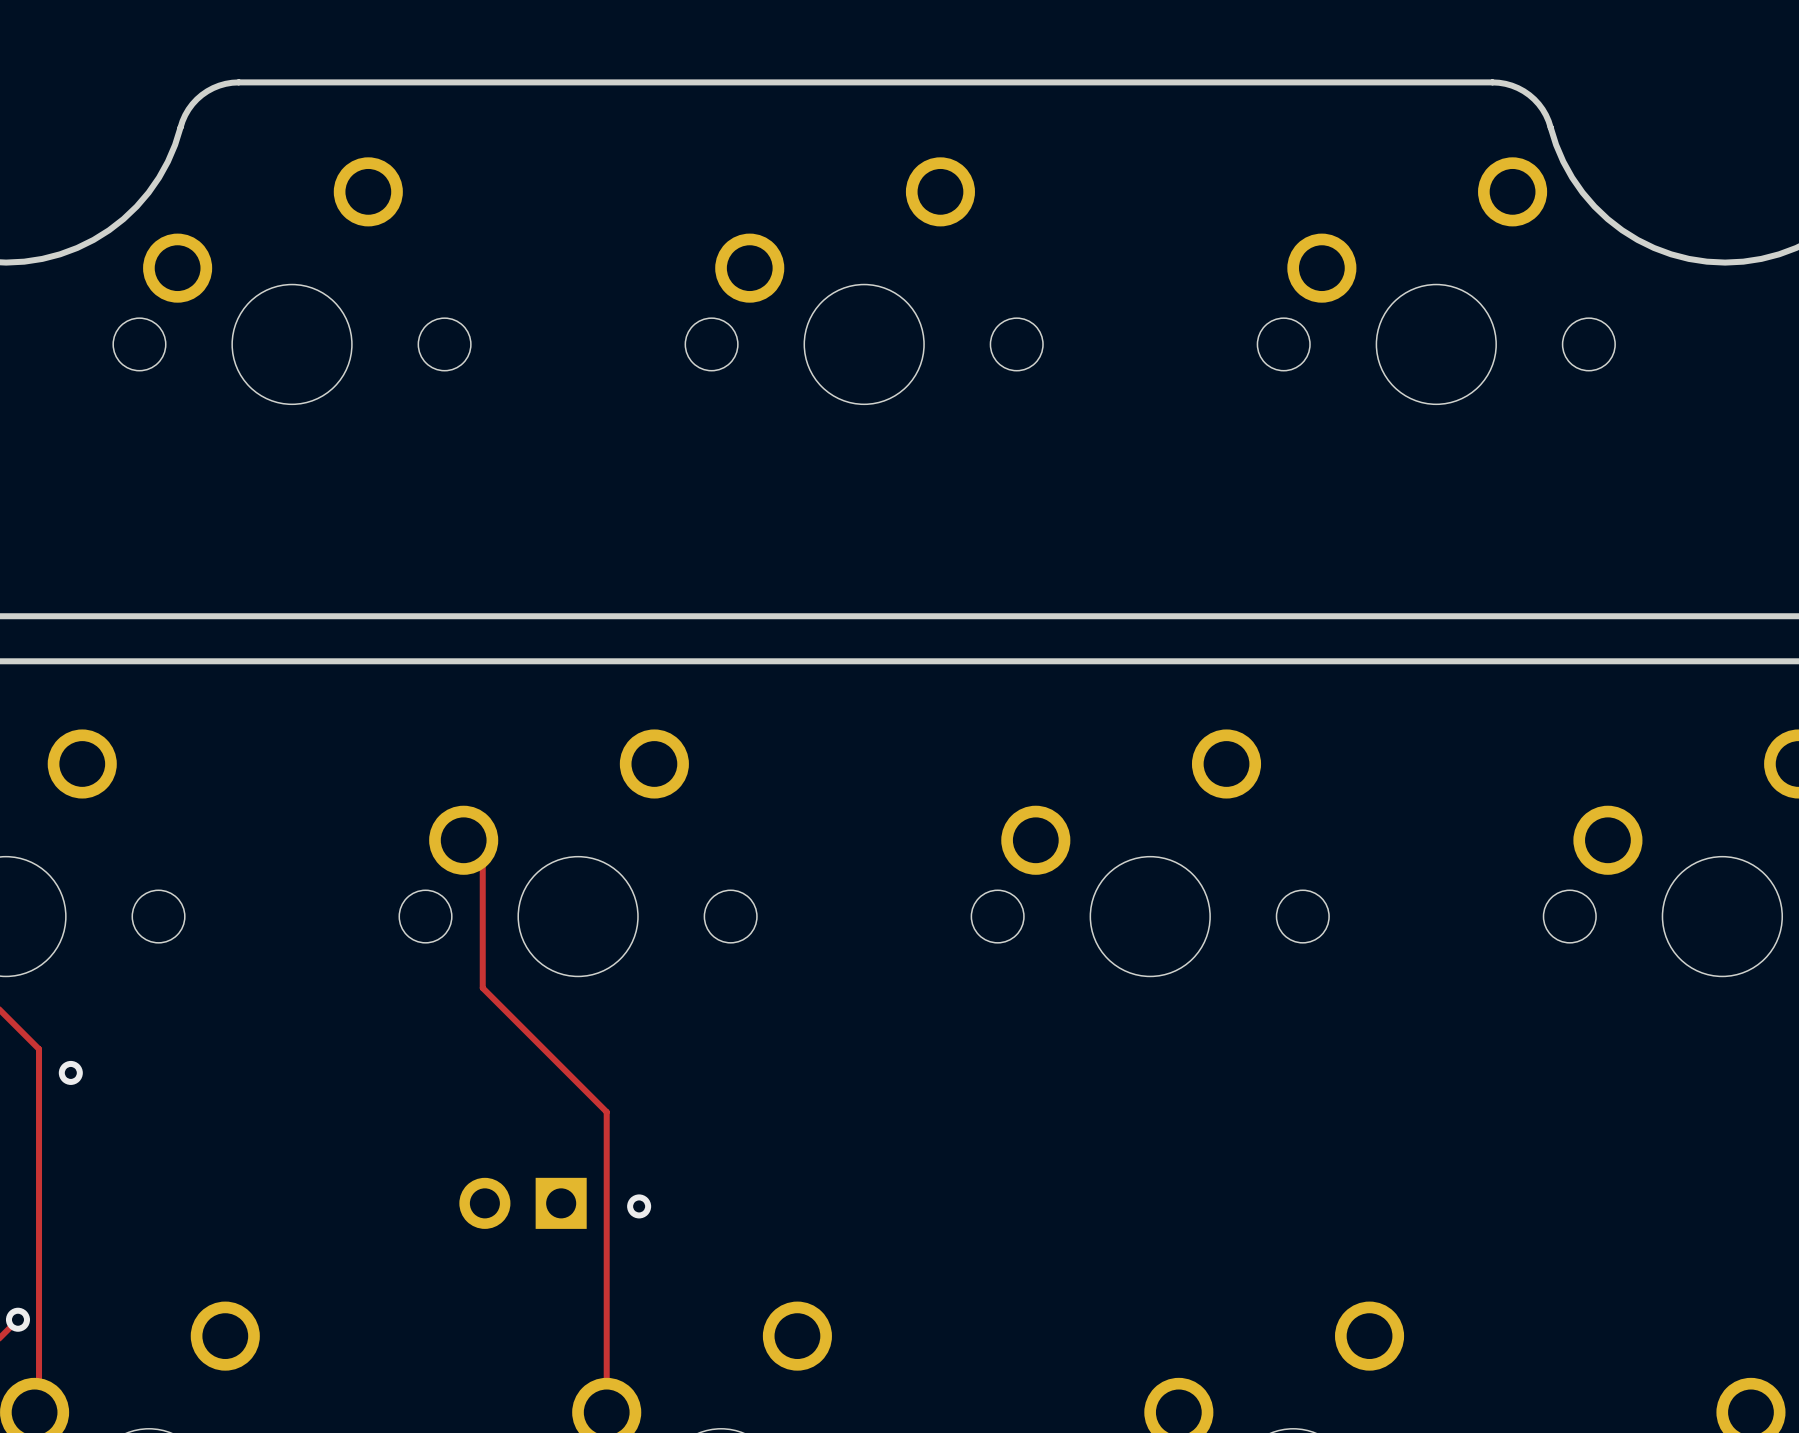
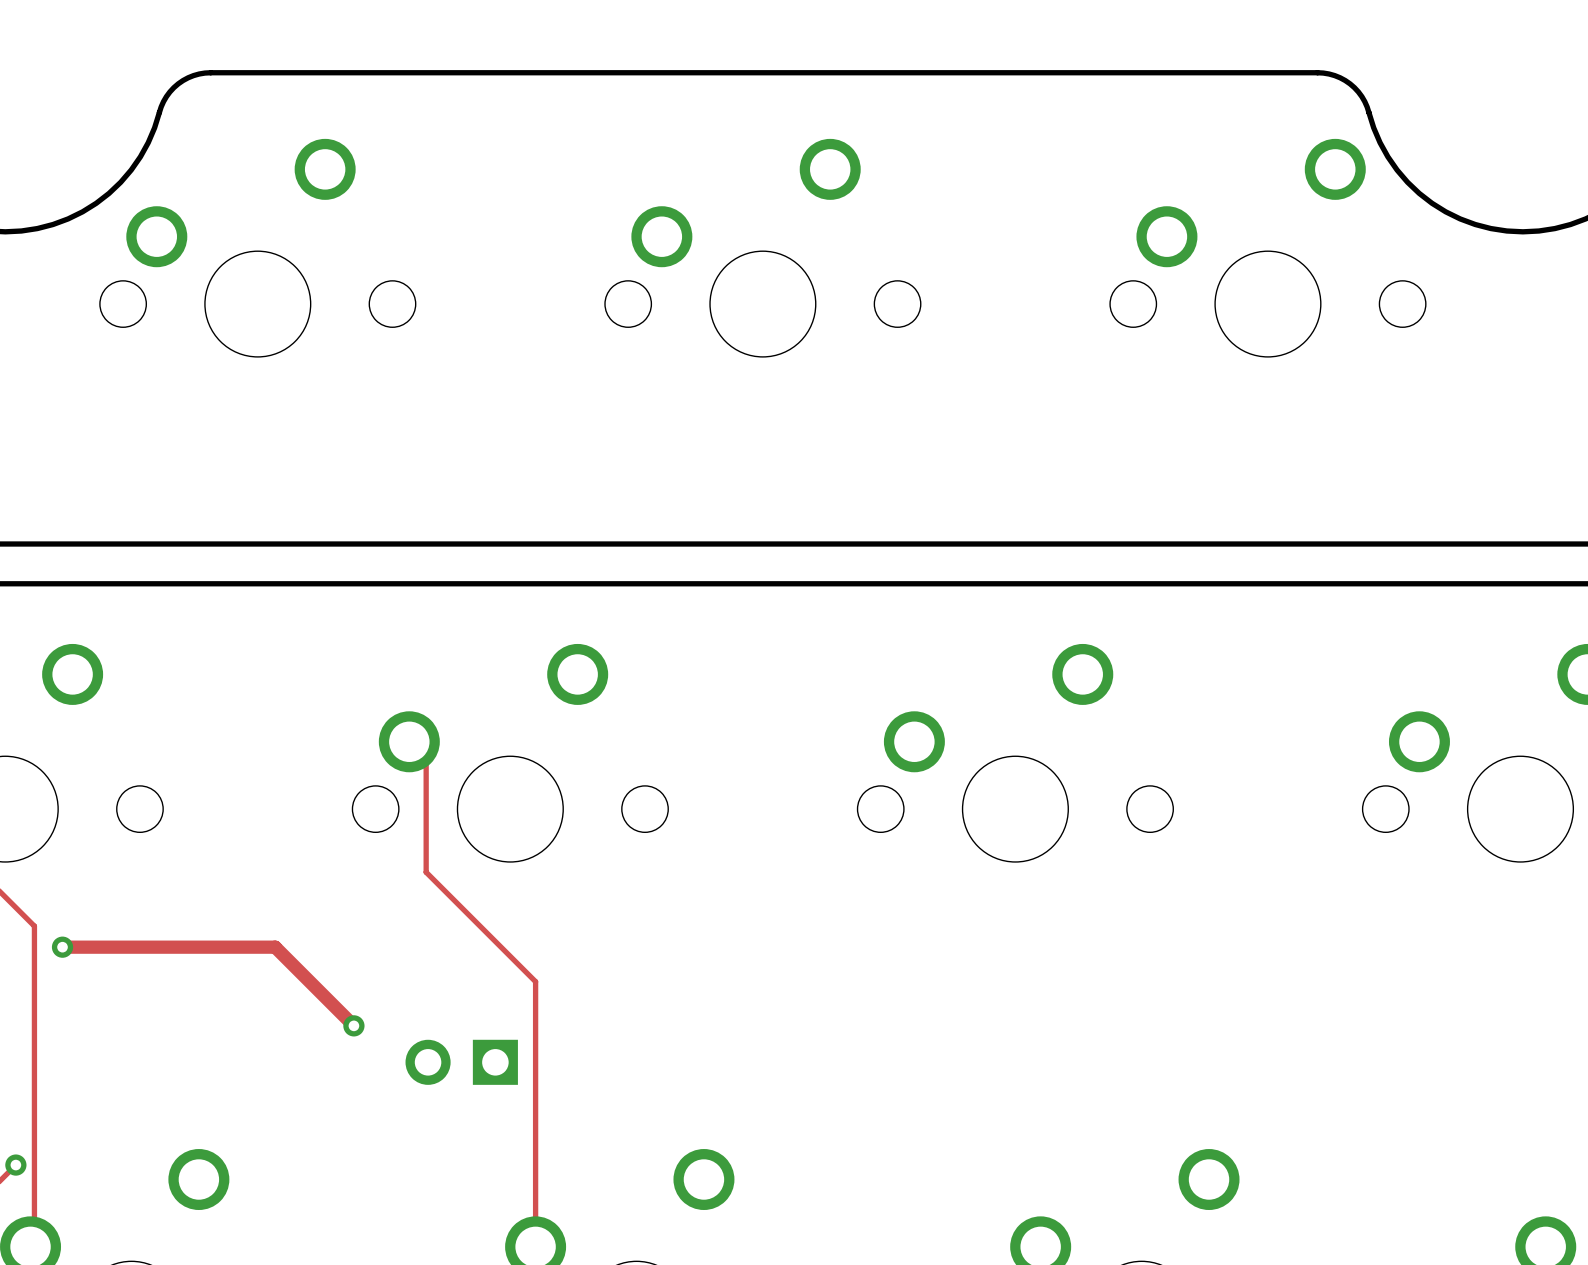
track: none -> (62, 947) (275, 947) (353, 1025)
via: none -> (353, 1025)
via: (639, 1206) -> none

